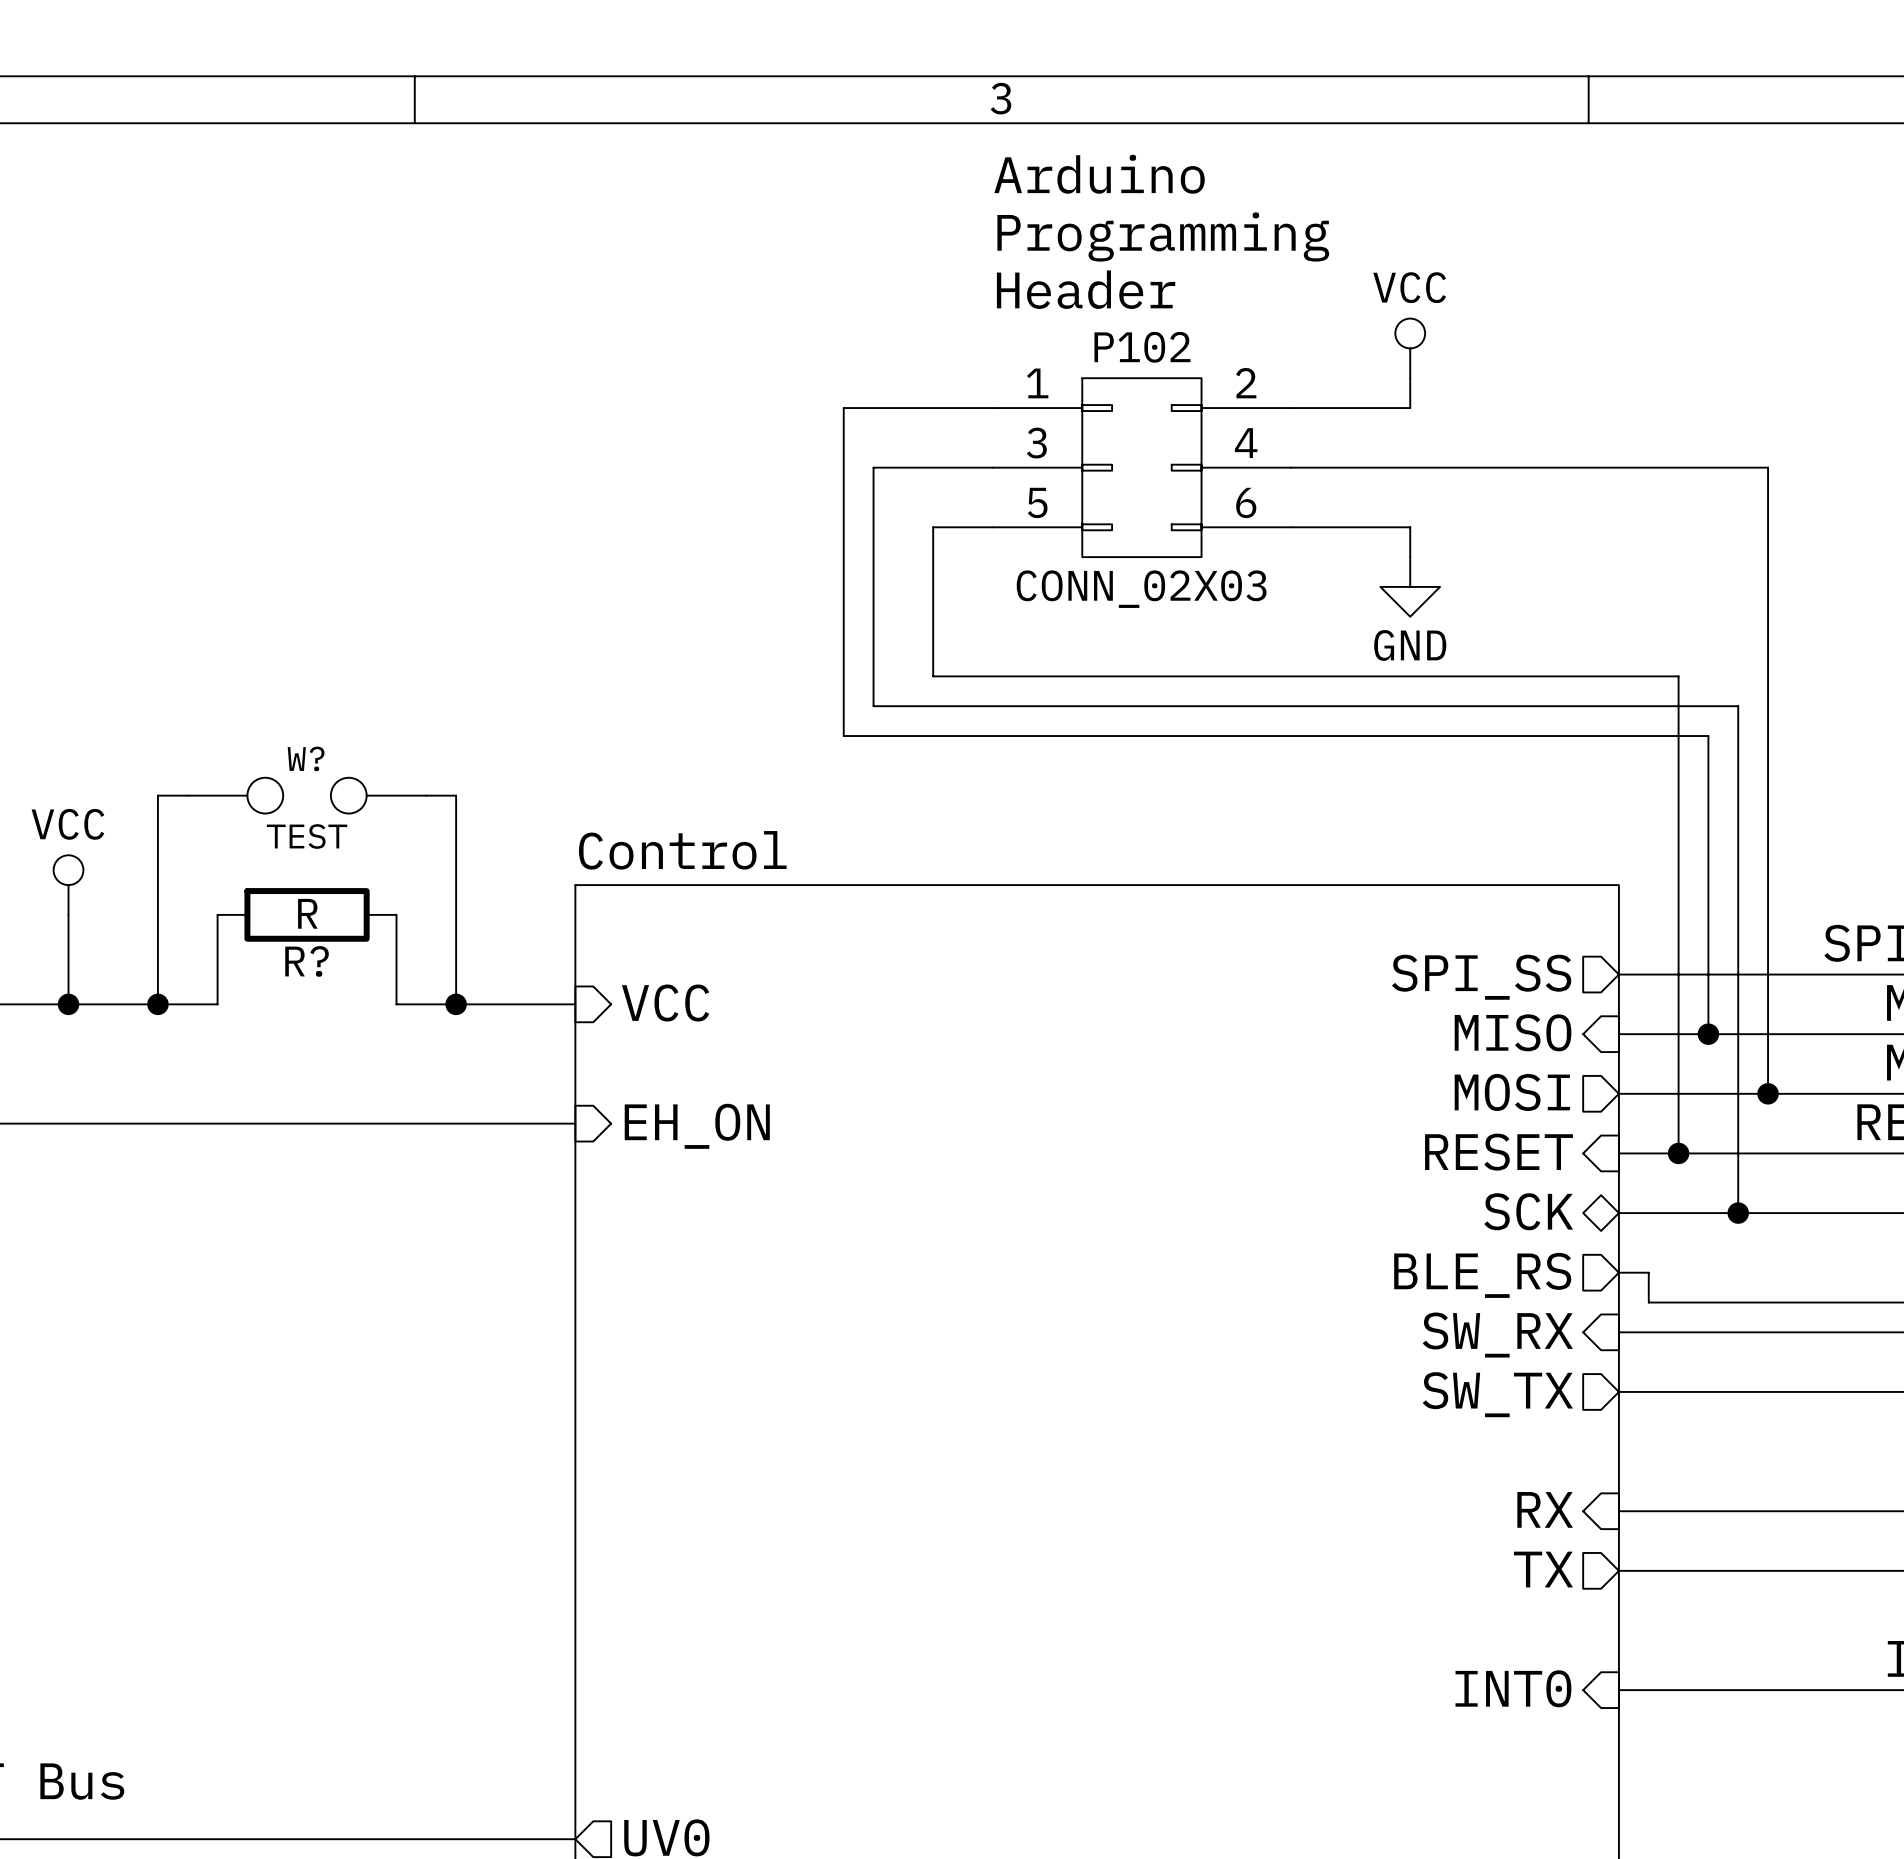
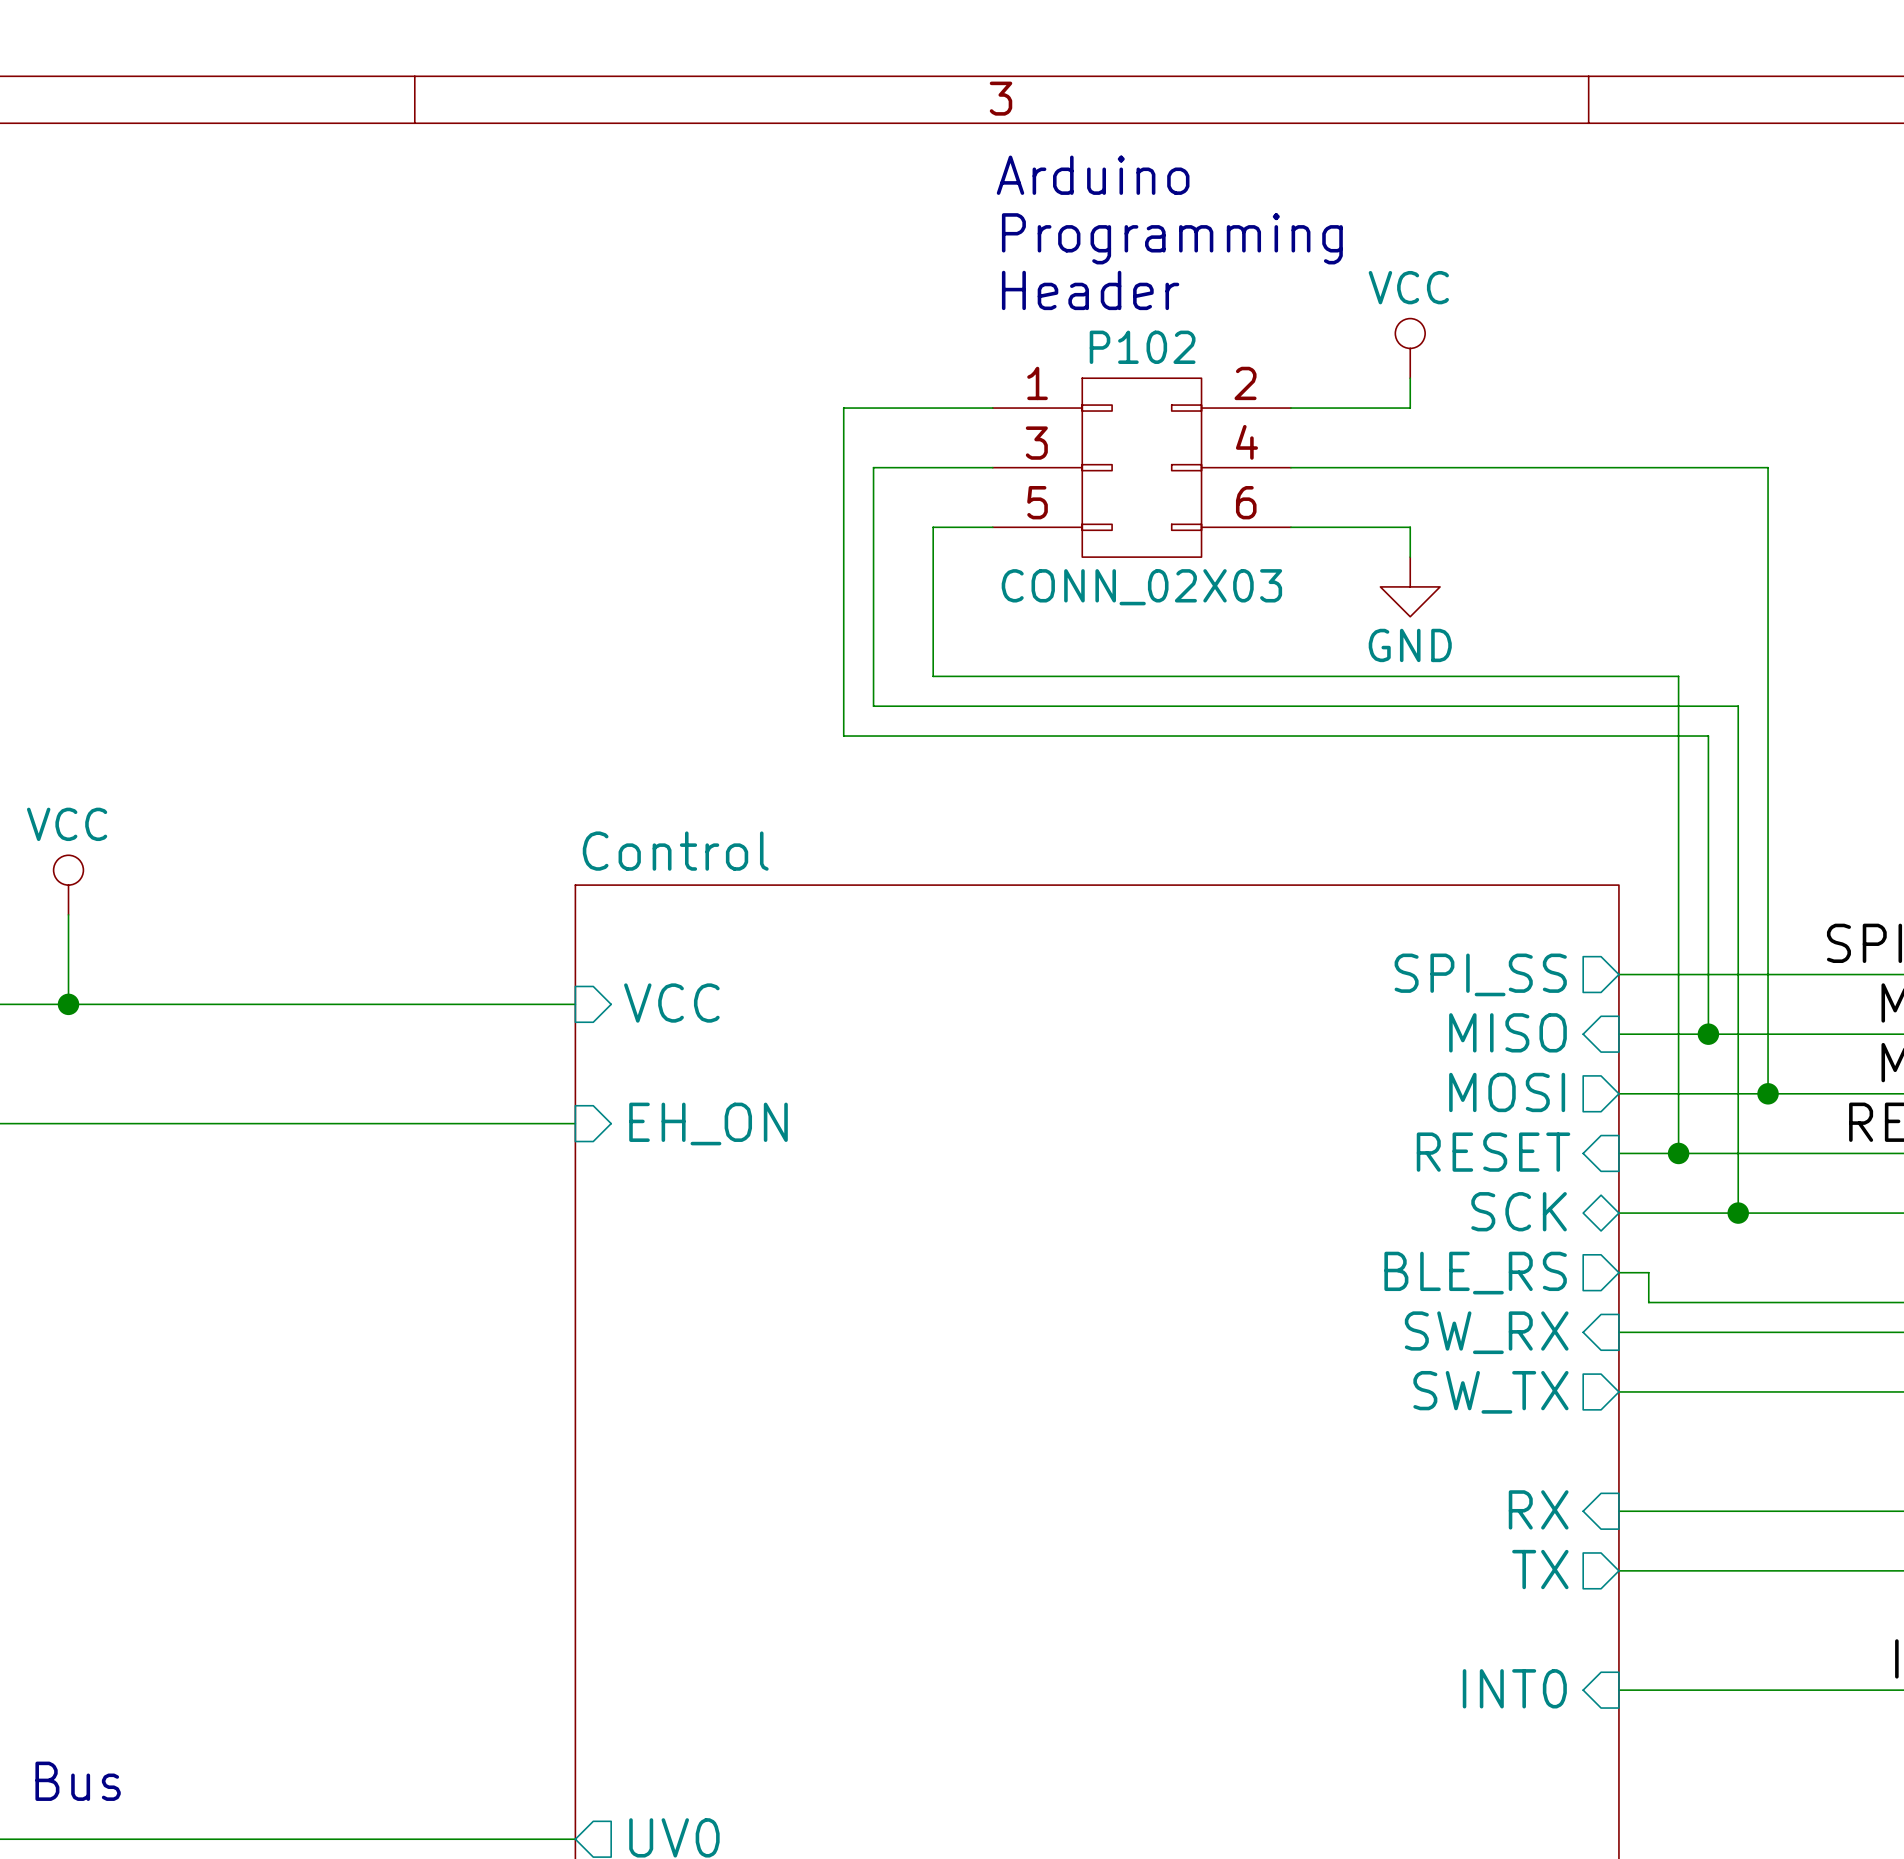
wire: (187, 795) (157, 795) (157, 1004) -> none
W?: TEST (307, 795) -> none
wire: (426, 795) (456, 795) (456, 1004) -> none
wire: (217, 914) (217, 1004) -> (396, 1004) (217, 1004)
R?: R (307, 914) -> none
wire: (396, 914) (396, 1004) -> none
junction: (157, 1004) -> none
junction: (456, 1004) -> none

